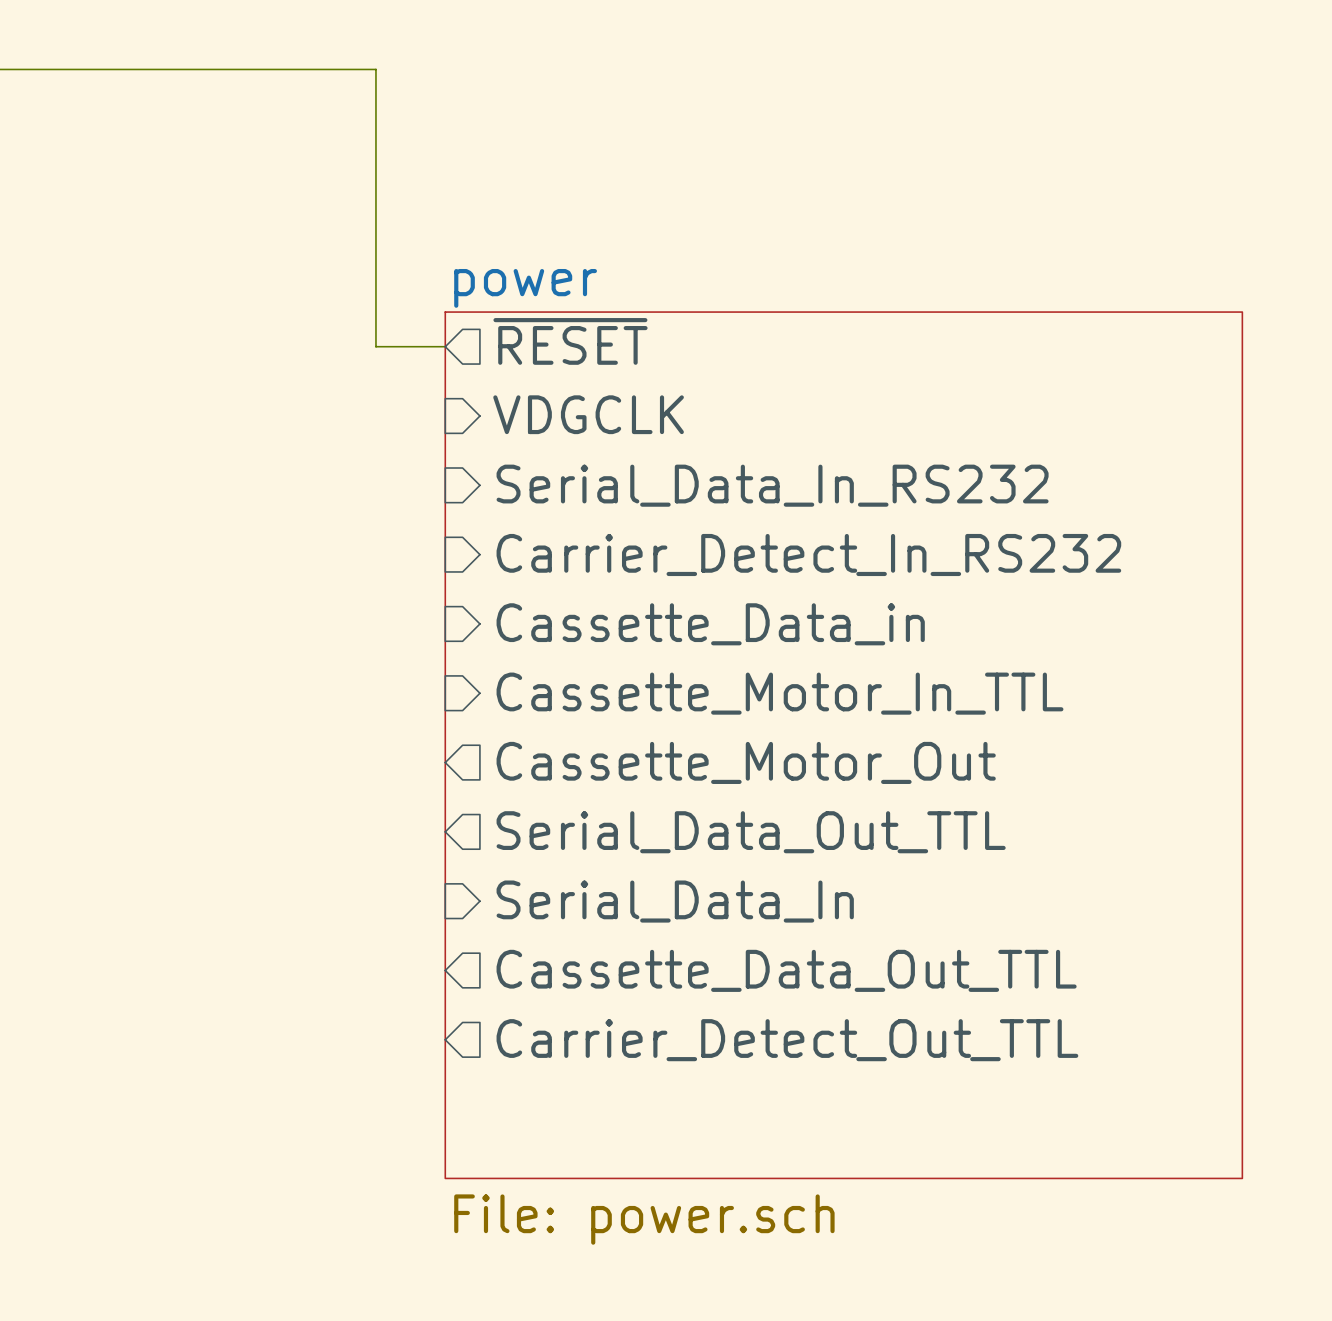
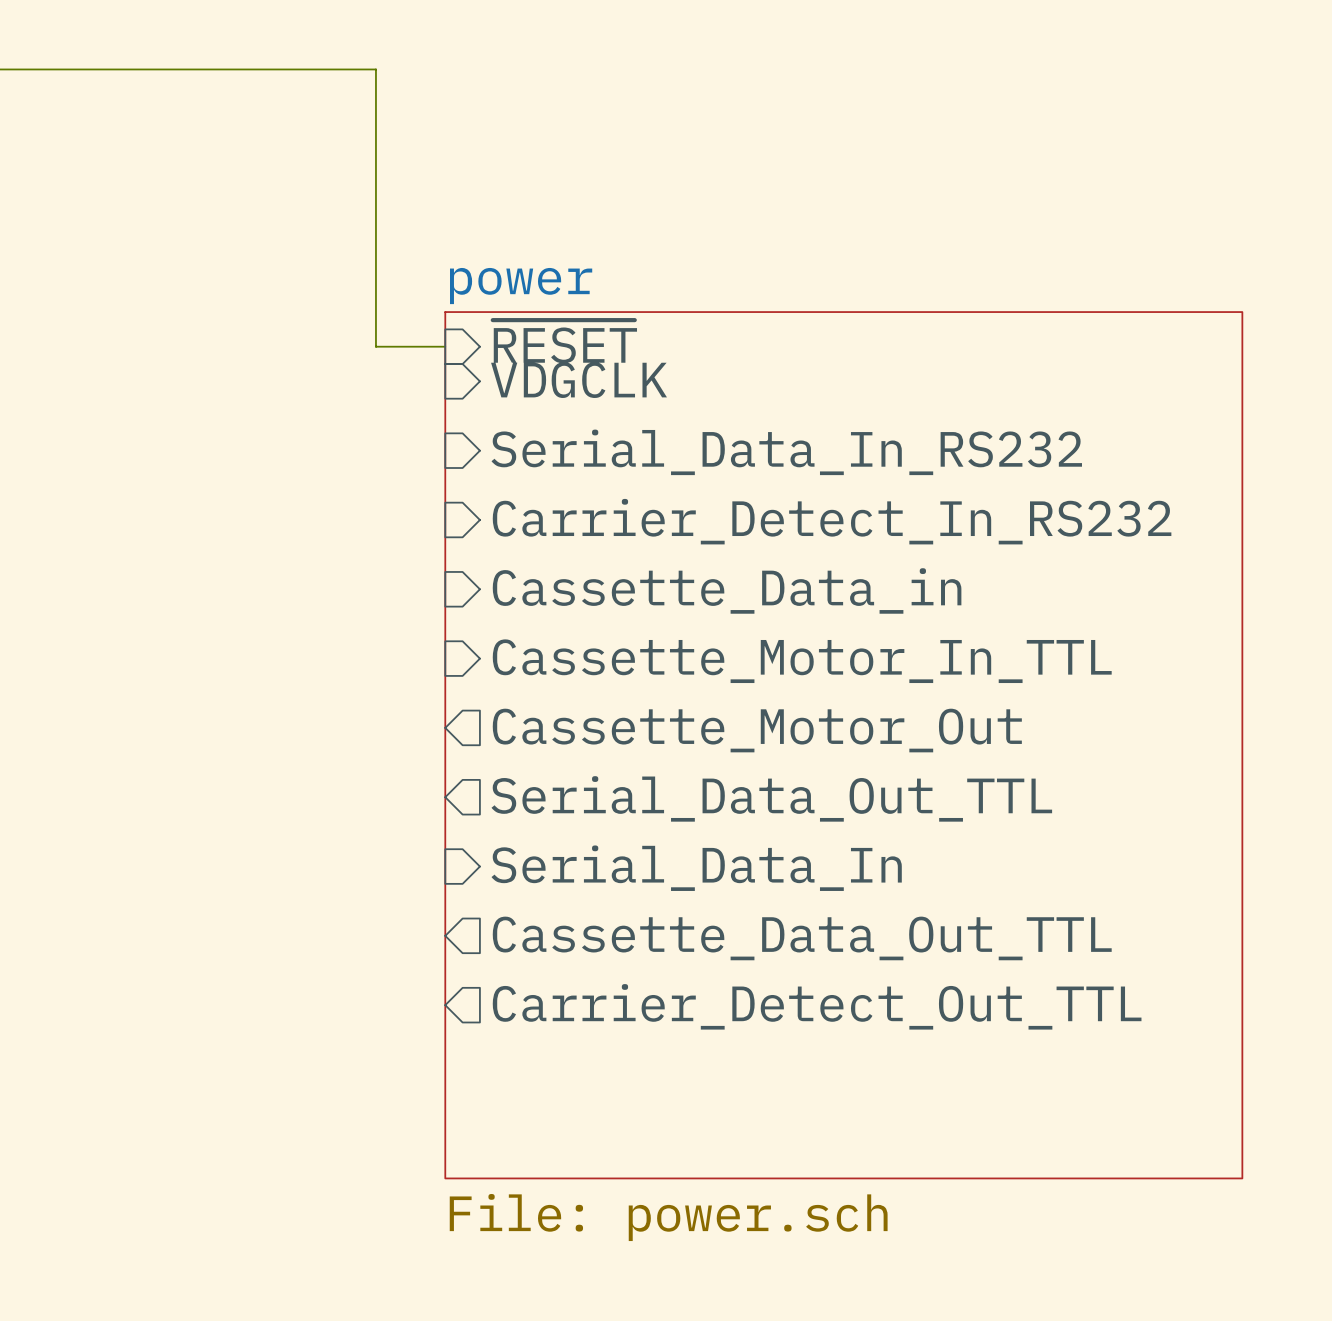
sheet pin shape: output (570, 341) -> input (564, 341)
sheet pin position: VDGCLK (588, 414) -> VDGCLK (579, 380)
sheet pin position: Serial_Data_In_RS232 (772, 485) -> Serial_Data_In_RS232 (786, 452)
sheet pin position: Carrier_Detect_In_RS232 (808, 554) -> Carrier_Detect_In_RS232 (832, 521)
sheet pin position: Cassette_Data_in (710, 624) -> Cassette_Data_in (727, 590)
sheet pin position: Cassette_Motor_In_TTL (780, 693) -> Cassette_Motor_In_TTL (802, 661)
sheet pin position: Cassette_Motor_Out (746, 762) -> Cassette_Motor_Out (757, 730)
sheet pin position: Serial_Data_Out_TTL (751, 832) -> Serial_Data_Out_TTL (771, 798)
sheet pin position: Serial_Data_In (675, 901) -> Serial_Data_In (696, 868)
sheet pin position: Cassette_Data_Out_TTL (786, 970) -> Cassette_Data_Out_TTL (802, 938)
sheet pin position: Carrier_Detect_Out_TTL (787, 1040) -> Carrier_Detect_Out_TTL (817, 1006)

